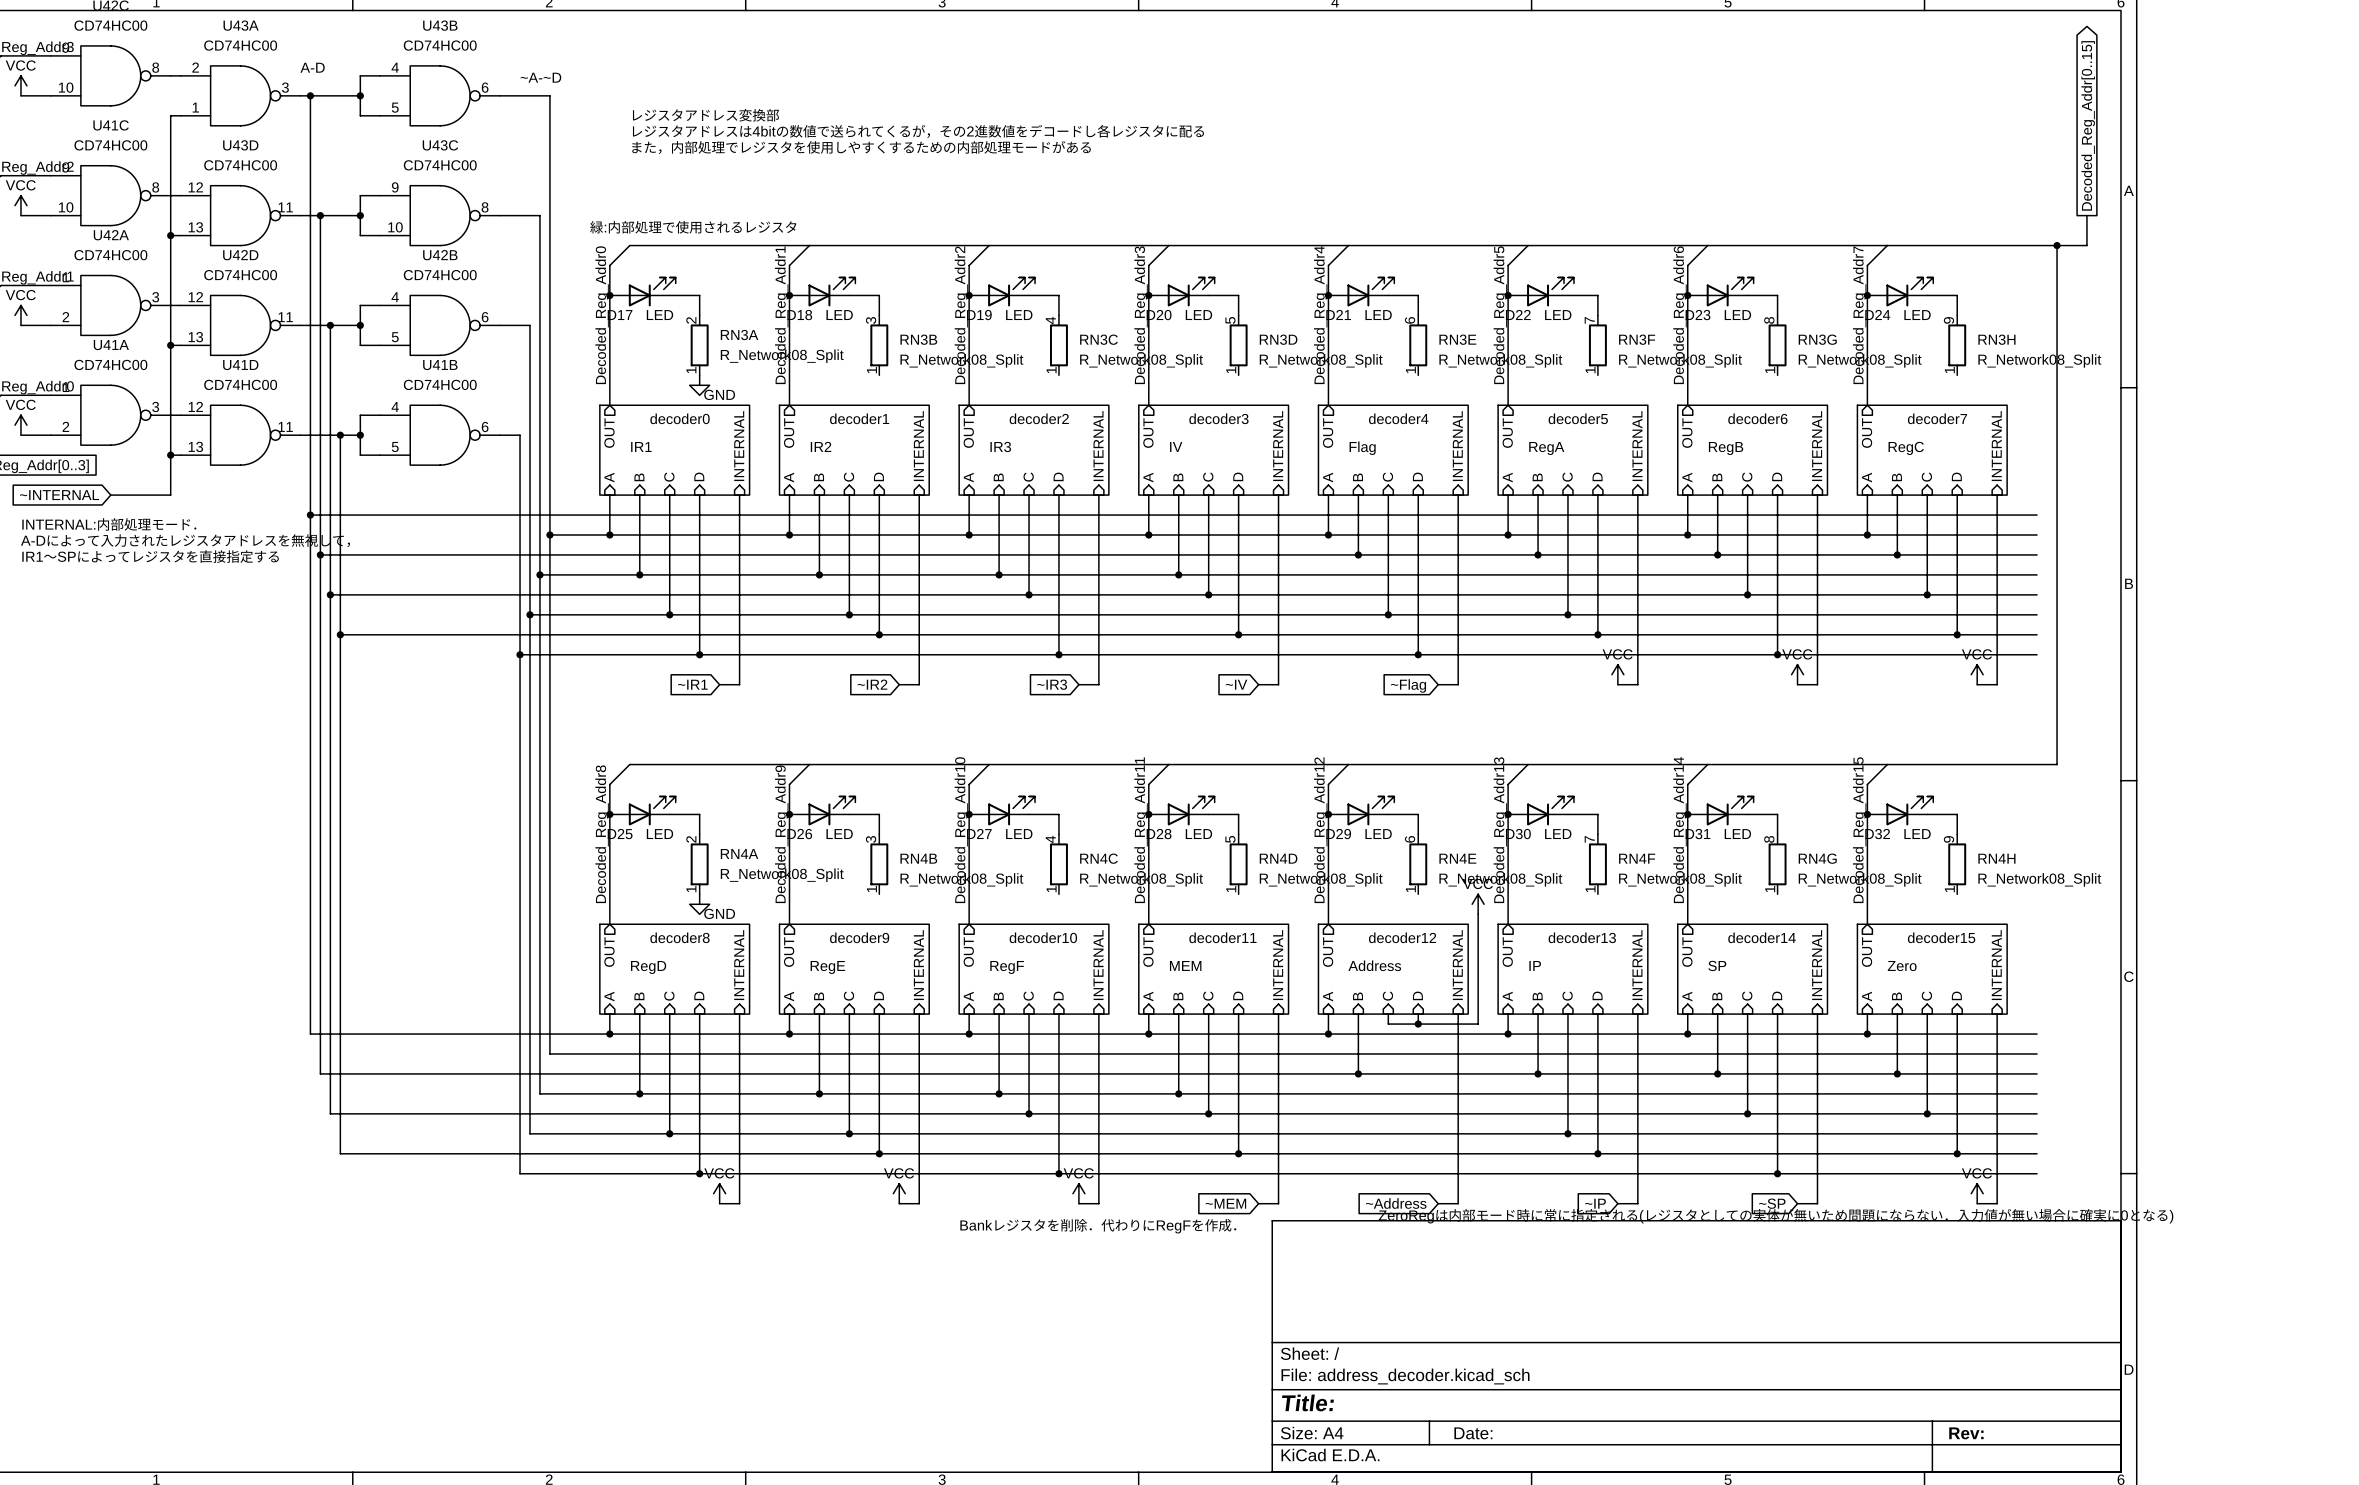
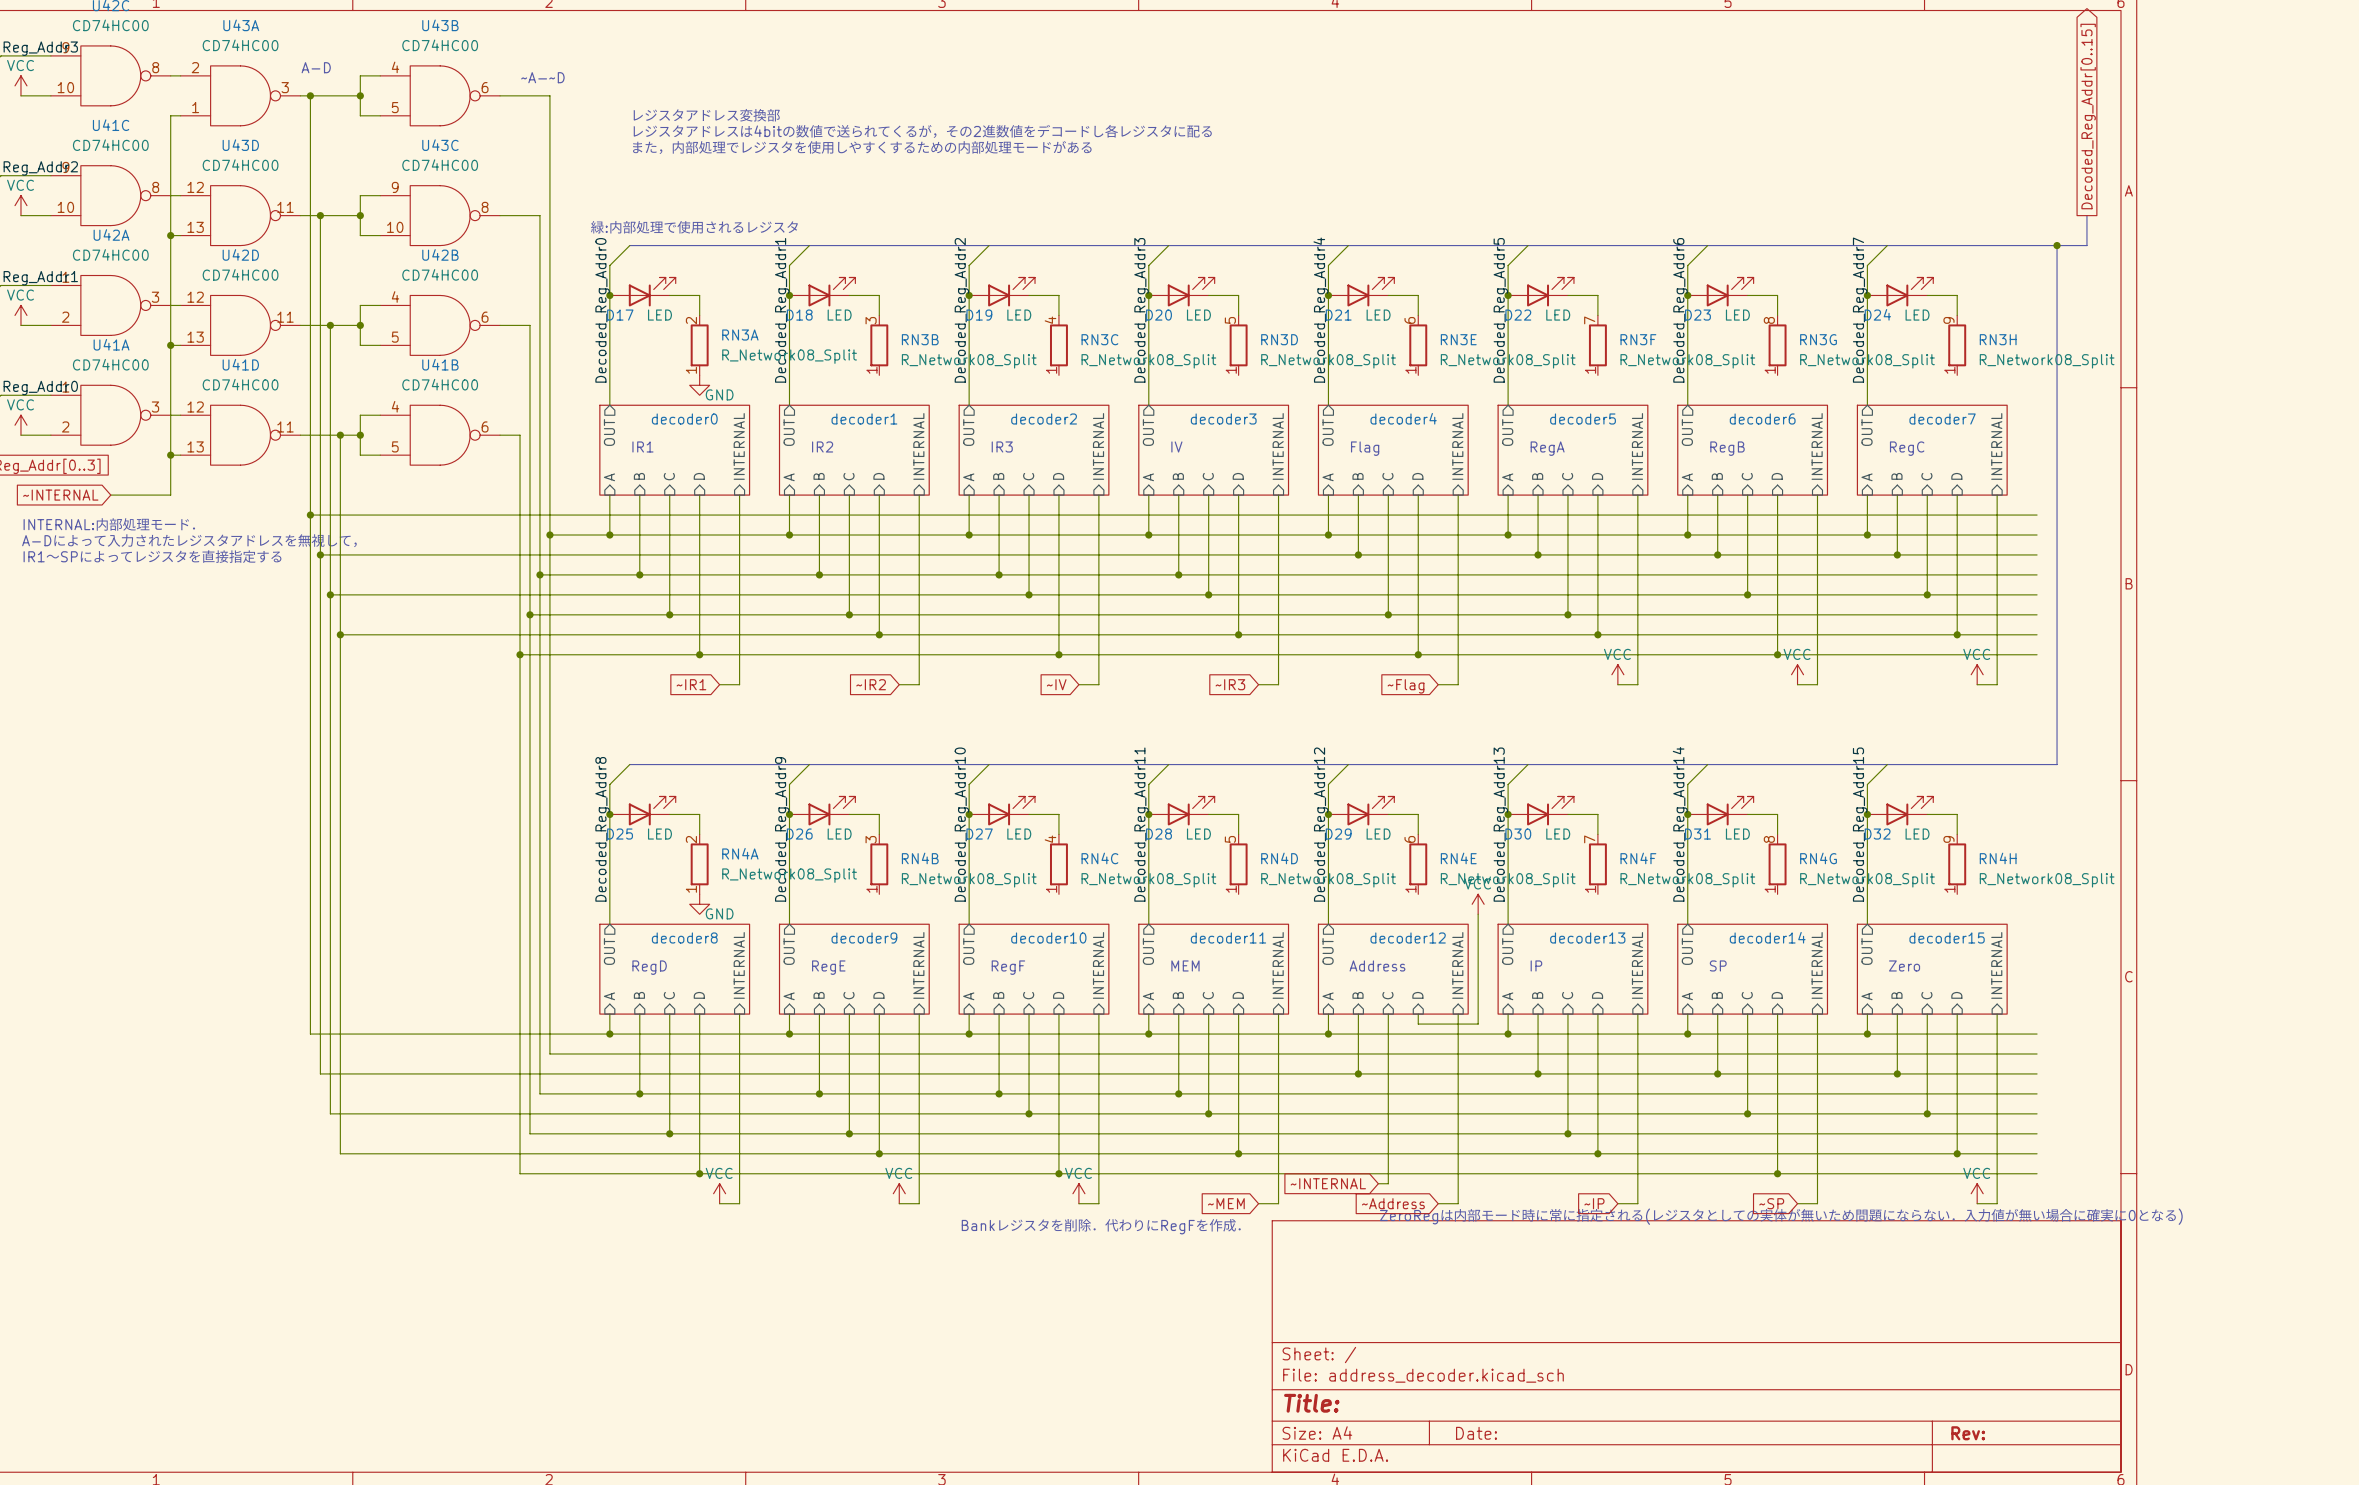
global label: ~IR3 (1052, 684) -> ~IV (1056, 684)
global label: ~IV (1236, 684) -> ~IR3 (1230, 684)
wire: (1388, 1024) (1418, 1024) -> (1388, 1024) (1388, 1183) (1378, 1183)
junction: (1418, 1024) -> none
global label: none -> ~INTERNAL (1328, 1183)

